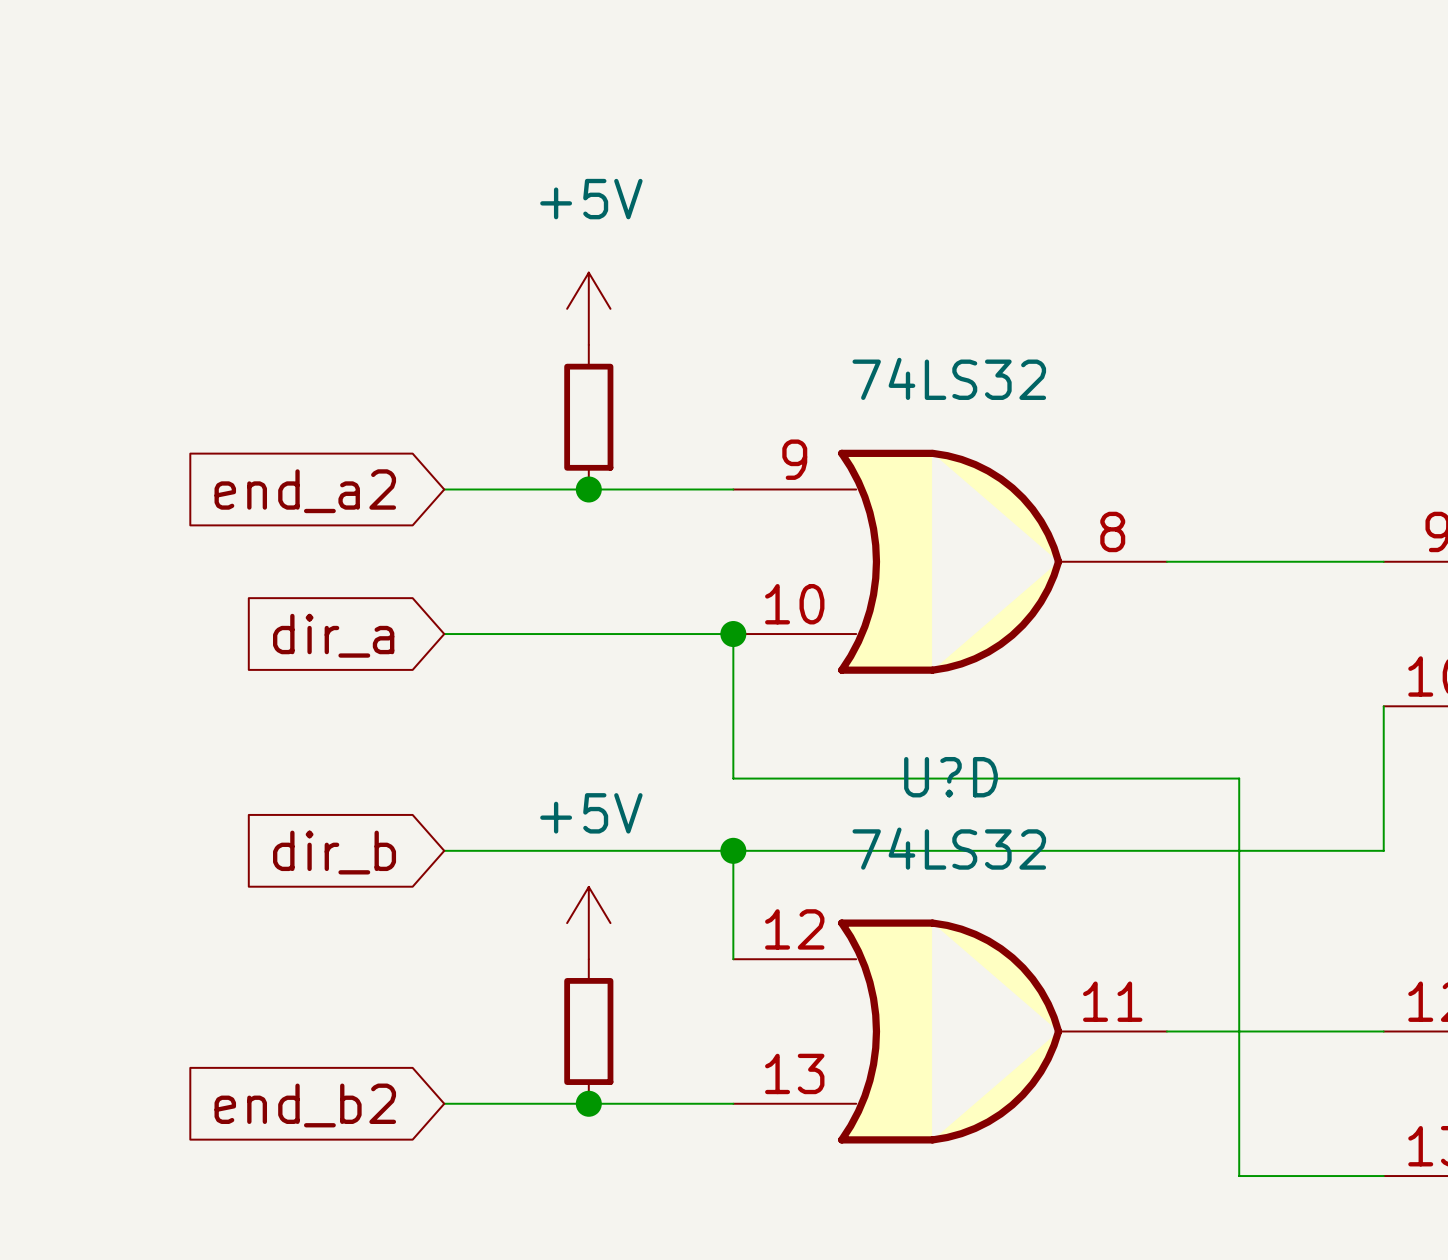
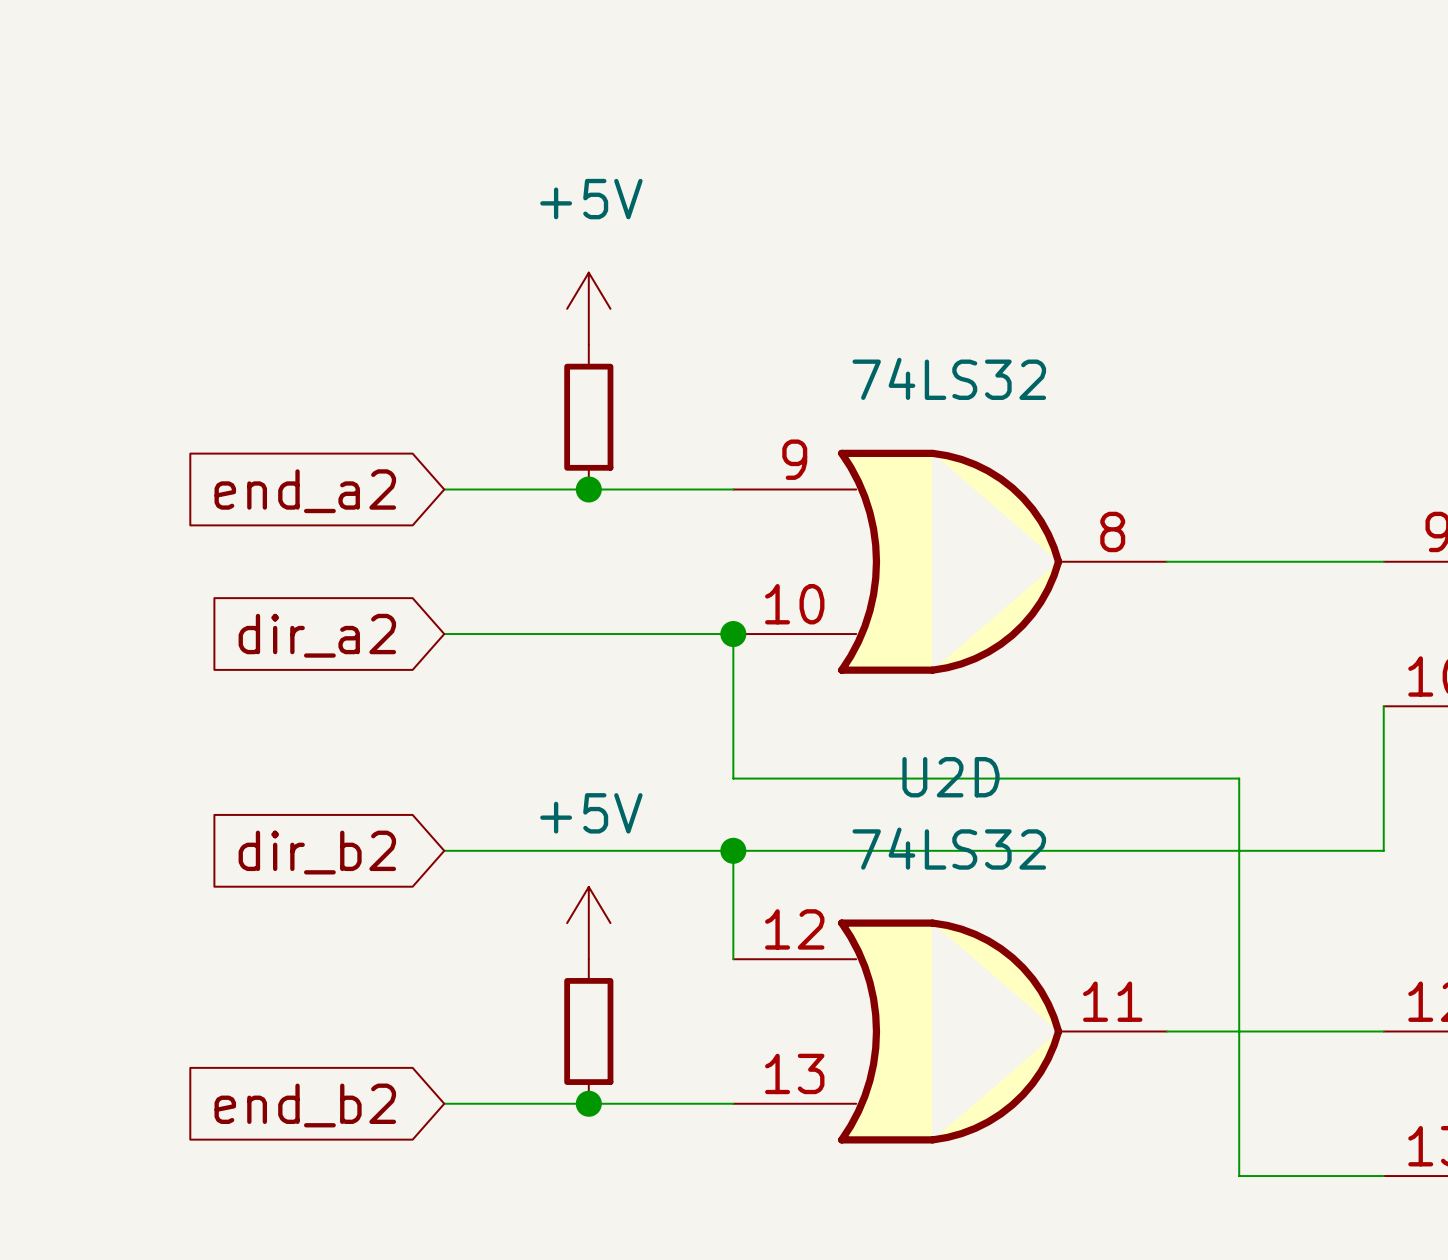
global label: dir_a (333, 635) -> dir_a2 (317, 635)
U?D name: U?D (951, 777) -> U2D (951, 777)
global label: dir_b (334, 852) -> dir_b2 (317, 852)

